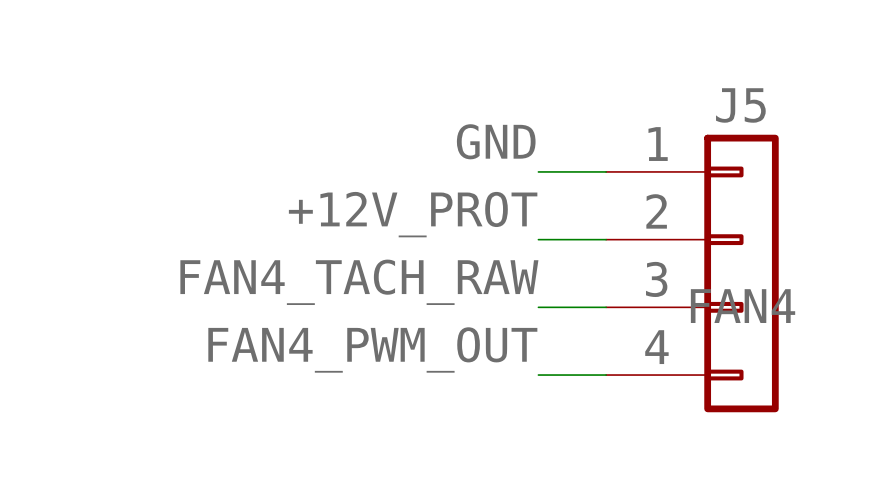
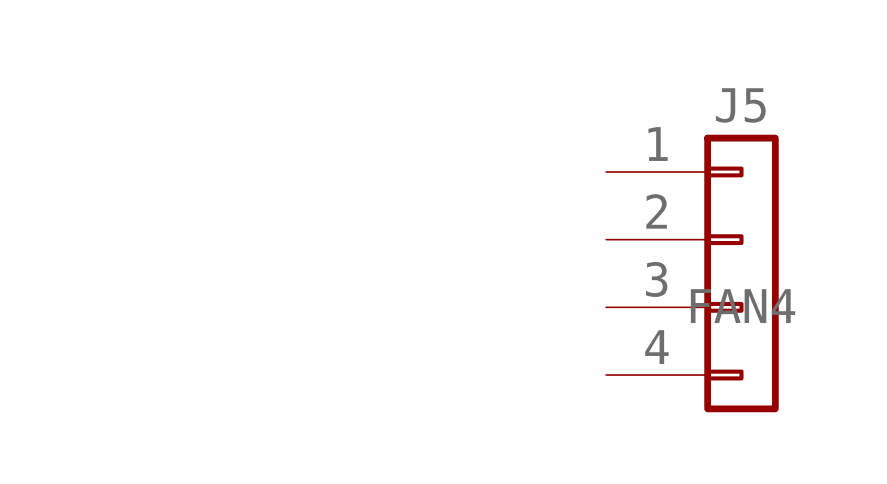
label: GND (496, 141) -> none
wire: (538, 171) (606, 171) -> none
label: +12V_PROT (413, 214) -> none
wire: (538, 239) (606, 239) -> none
label: FAN4_TACH_RAW (359, 282) -> none
wire: (538, 307) (606, 307) -> none
label: FAN4_PWM_OUT (372, 349) -> none
wire: (538, 375) (606, 375) -> none

